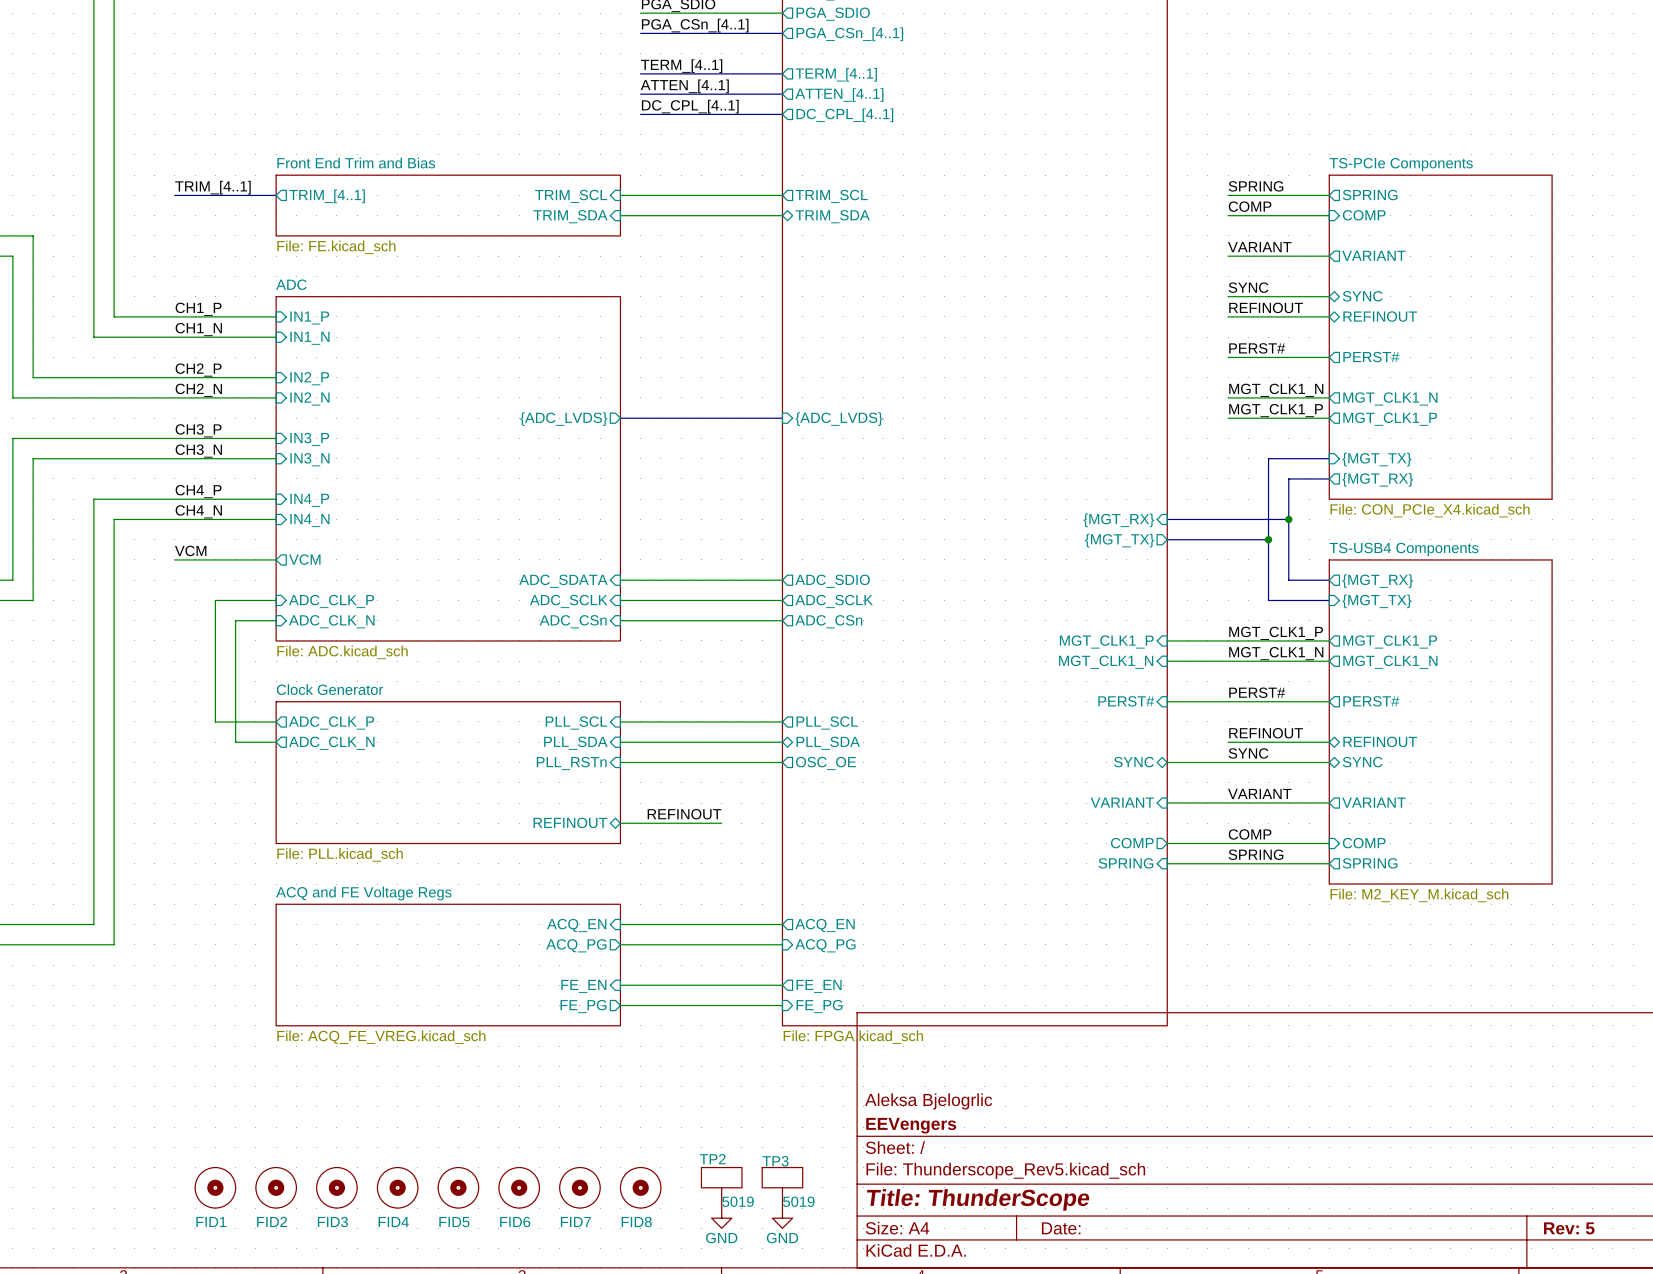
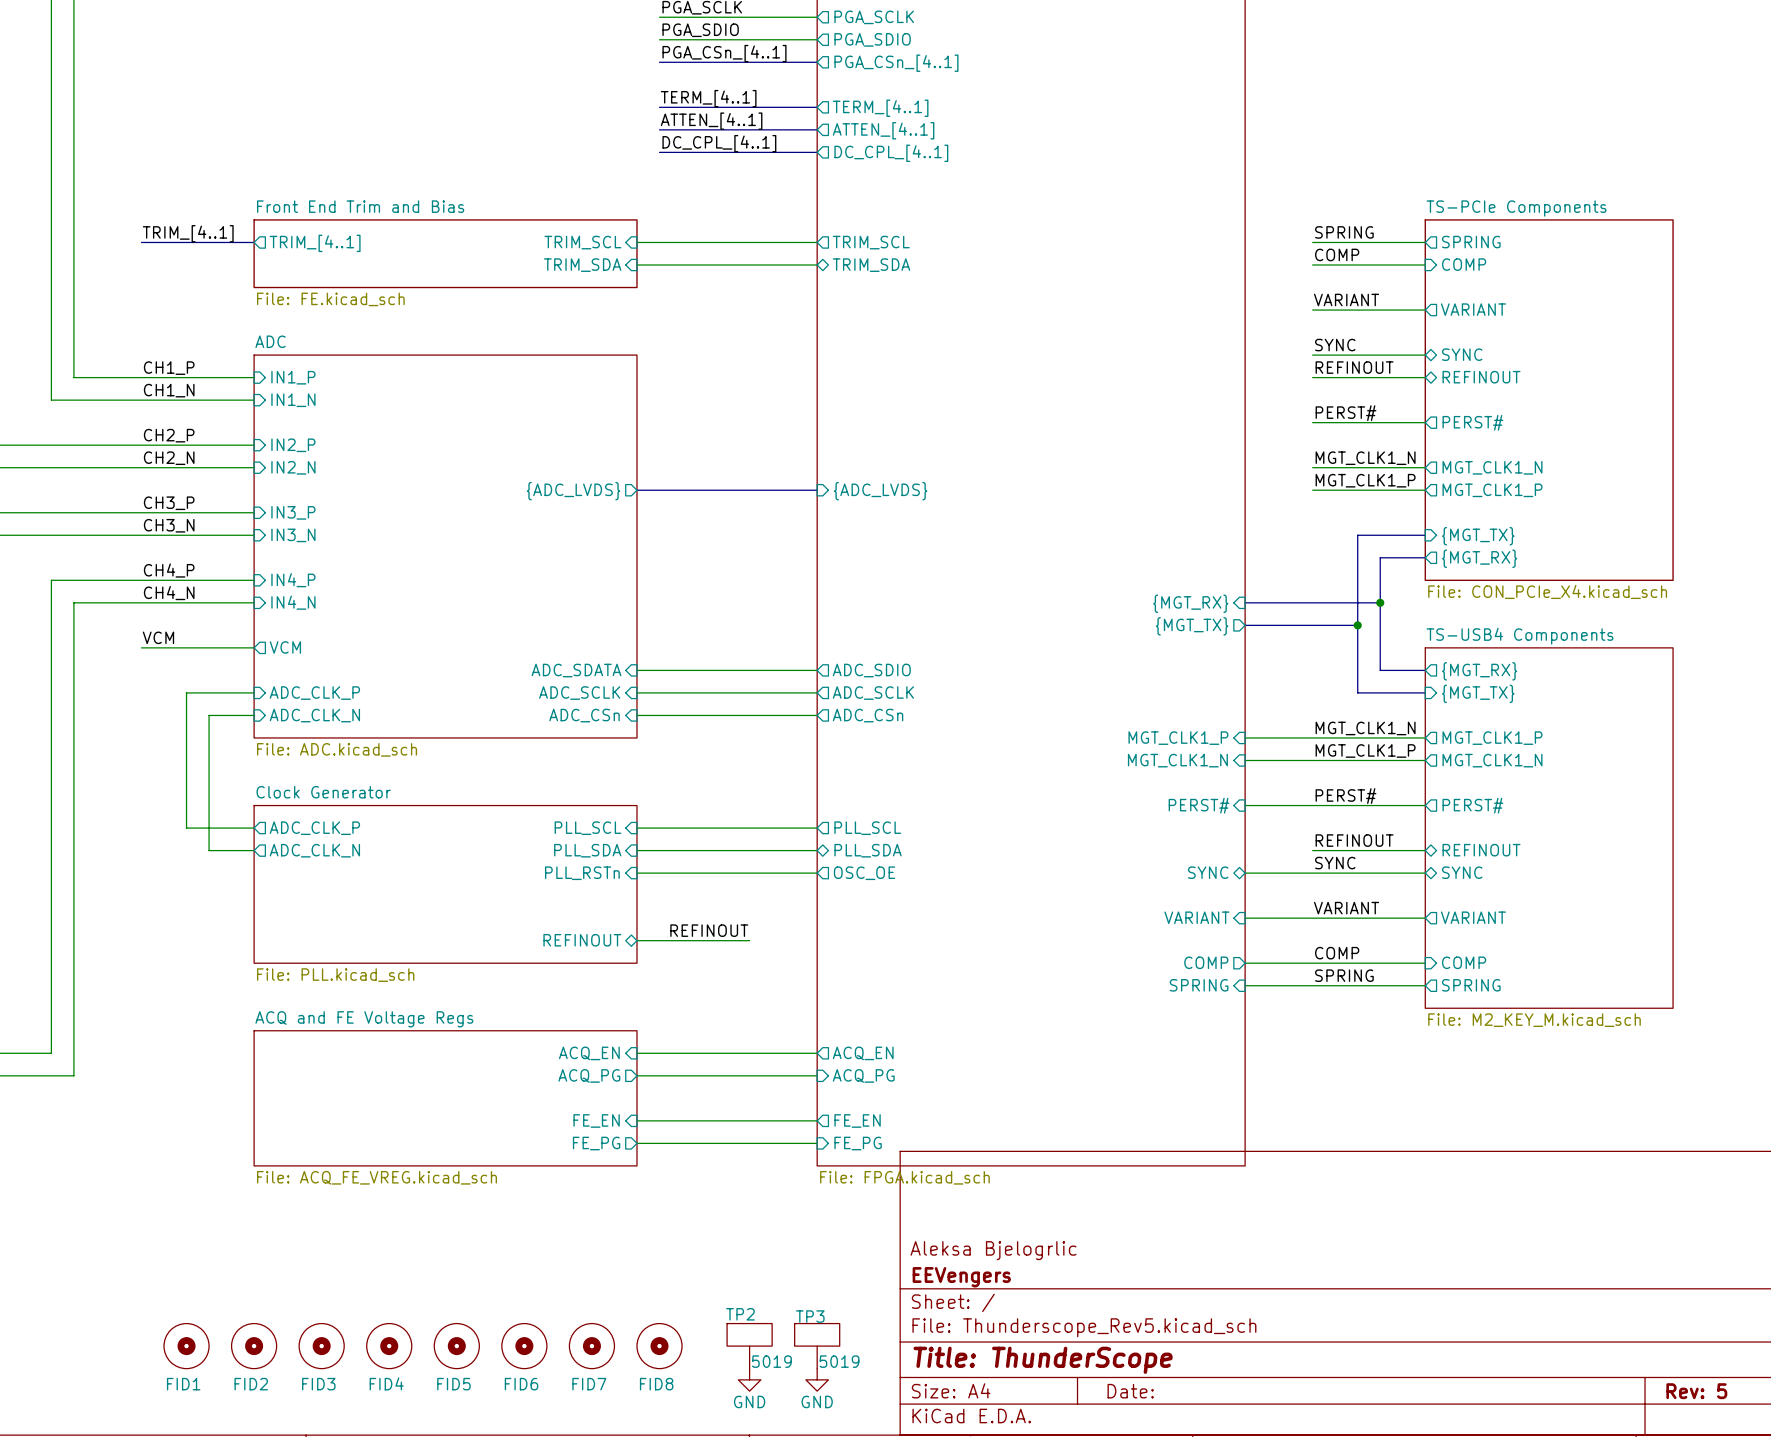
label: MGT_CLK1_P (1276, 633) -> MGT_CLK1_N (1365, 728)
label: MGT_CLK1_N (1276, 653) -> MGT_CLK1_P (1365, 750)

